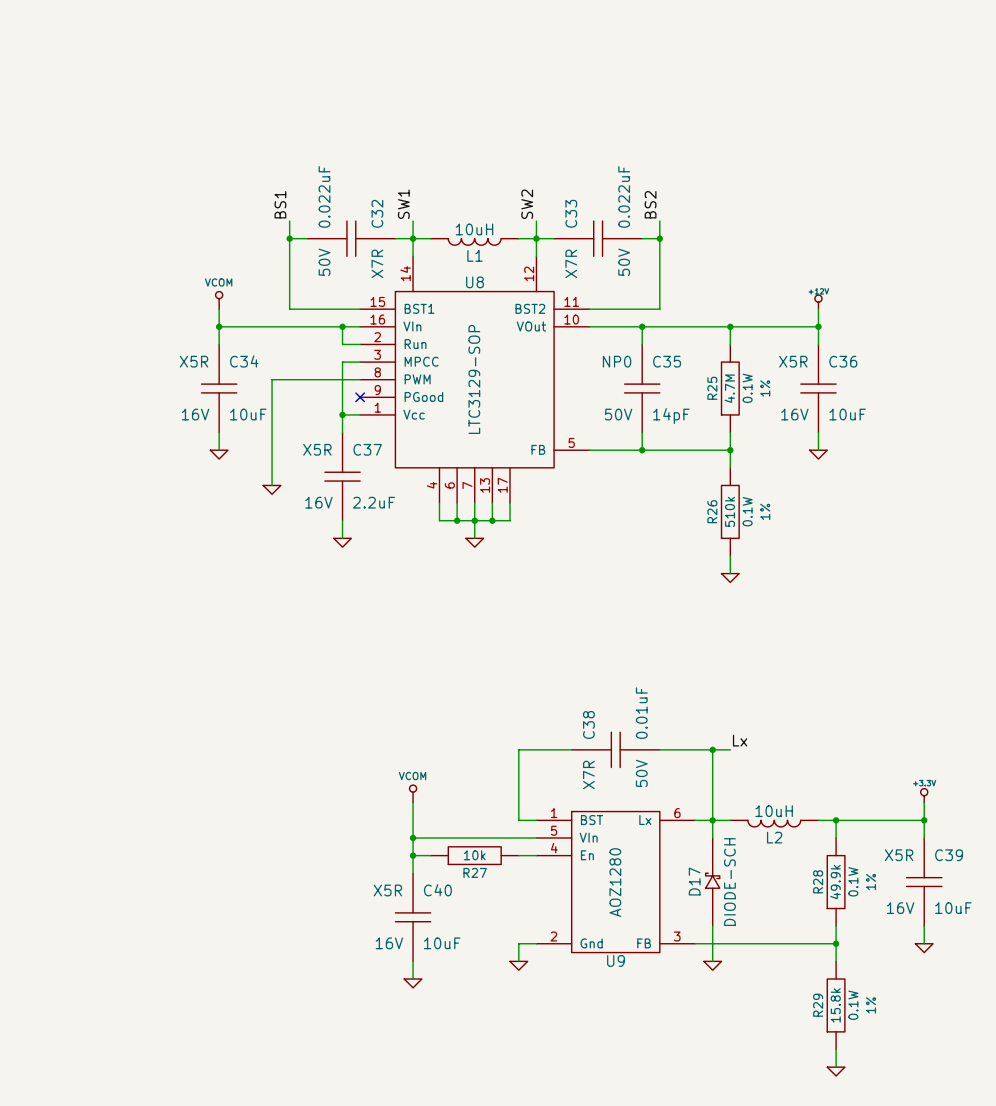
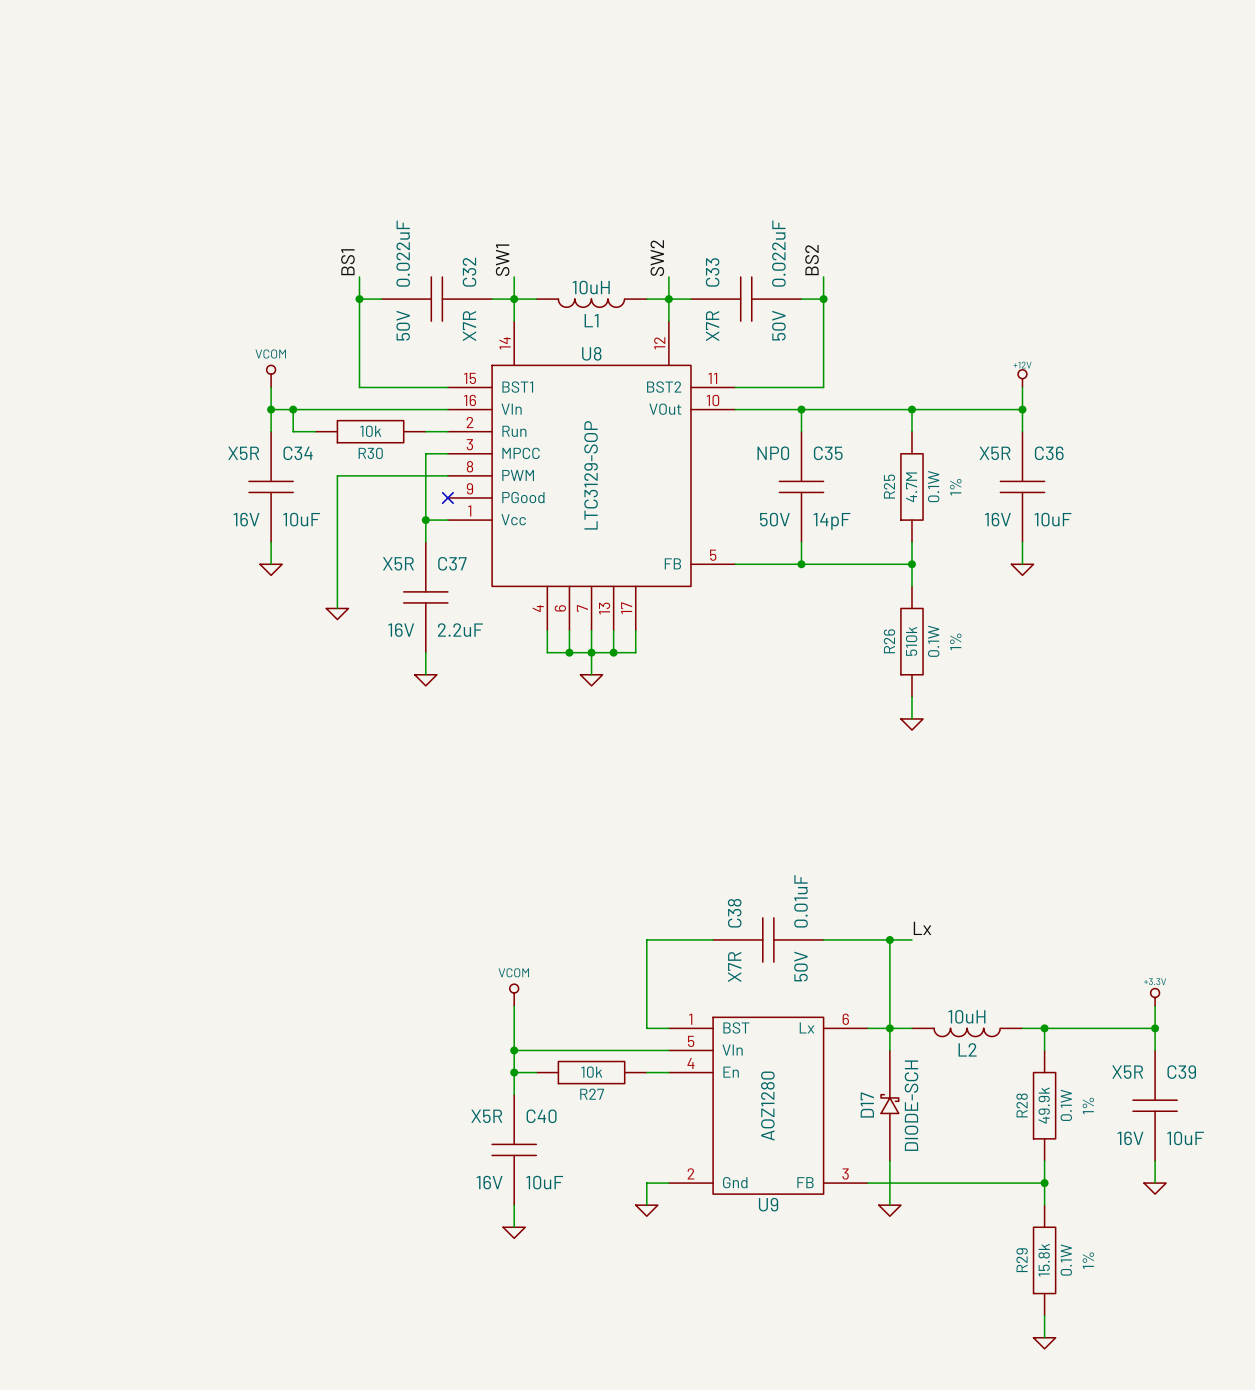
wire: none -> (293, 409) (293, 431) (315, 431)
junction: none -> (293, 409)
wire: (342, 326) (342, 344) -> none
junction: (342, 326) -> none
R30: none -> 10k (370, 431)

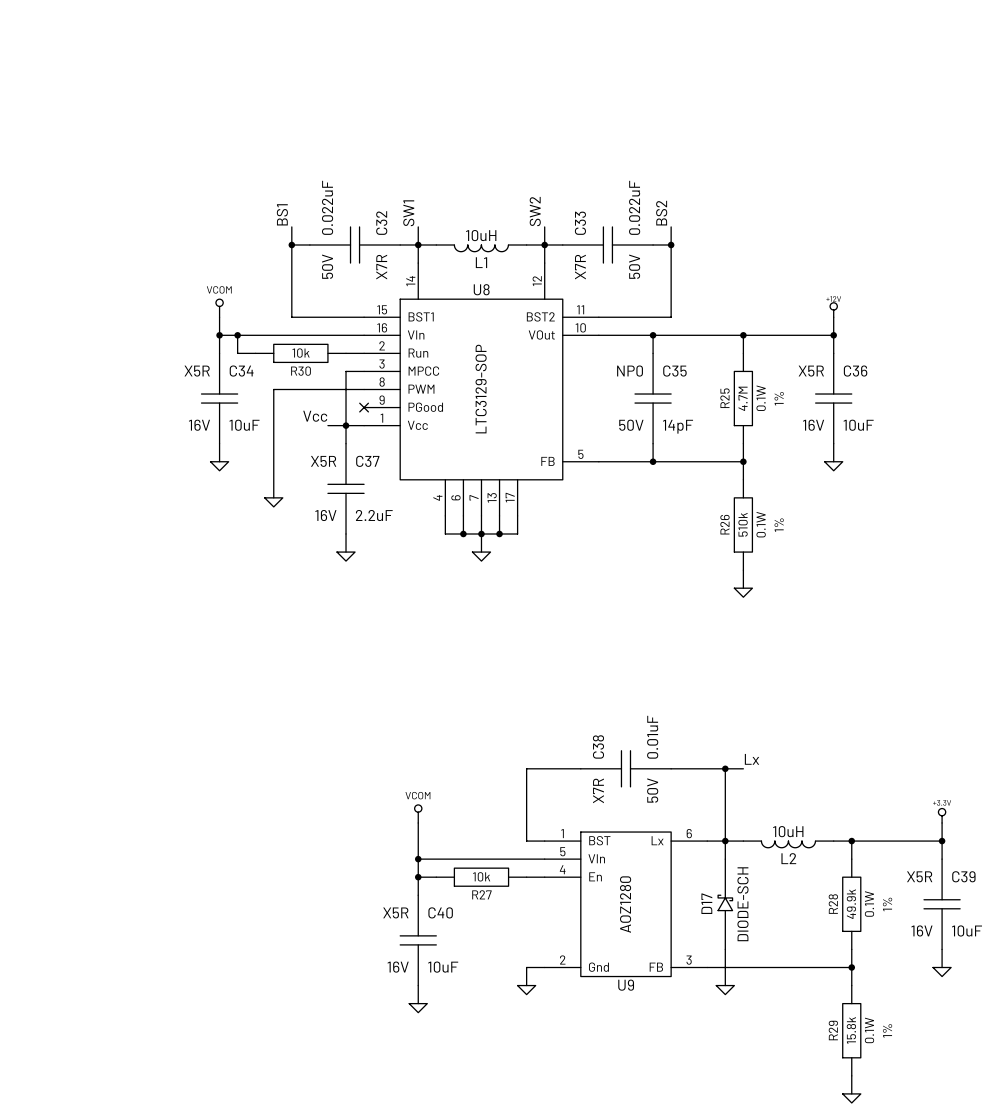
label: none -> Vcc (315, 416)
wire: none -> (327, 425) (346, 425)

